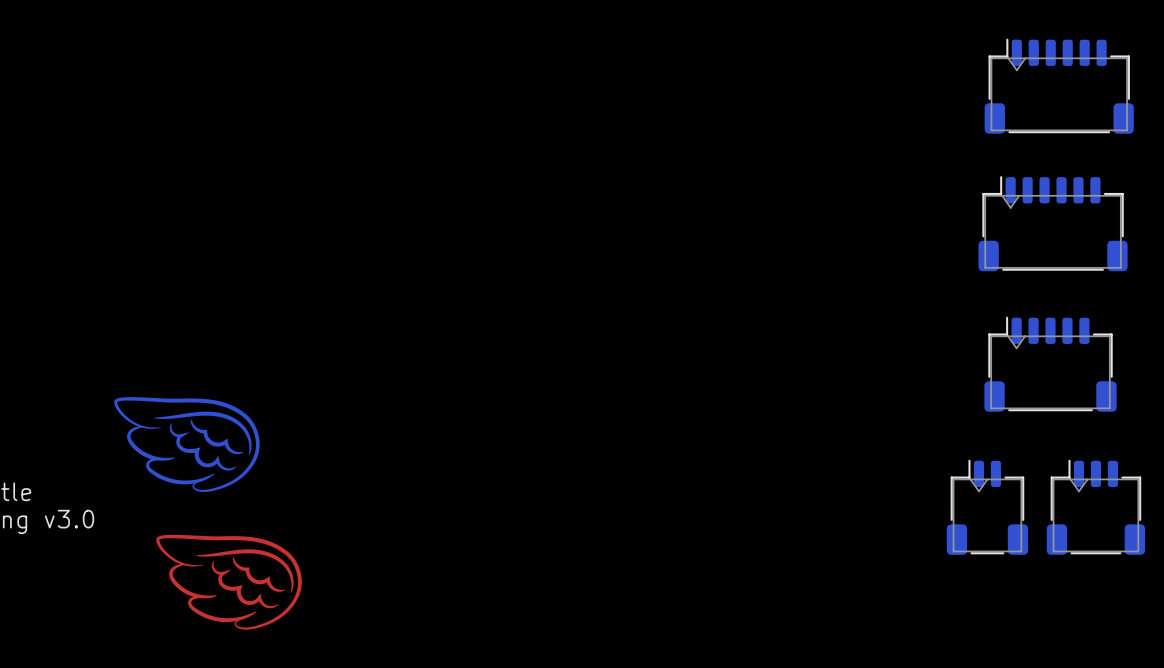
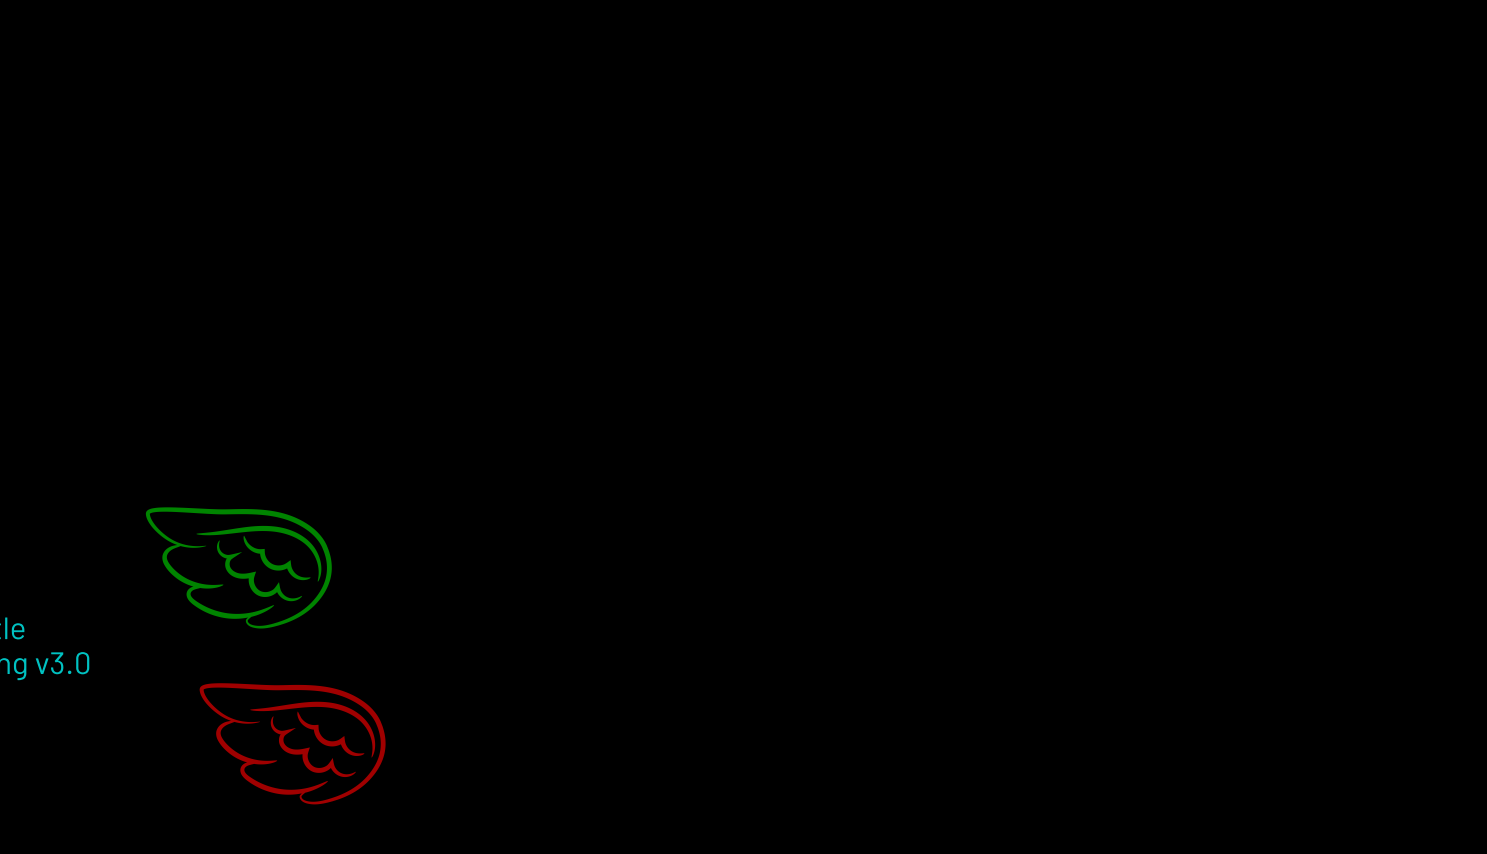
part: (1059, 86) -> none
part: (1053, 223) -> none
part: (1050, 364) -> none
part: (987, 507) -> none
part: (1095, 507) -> none

